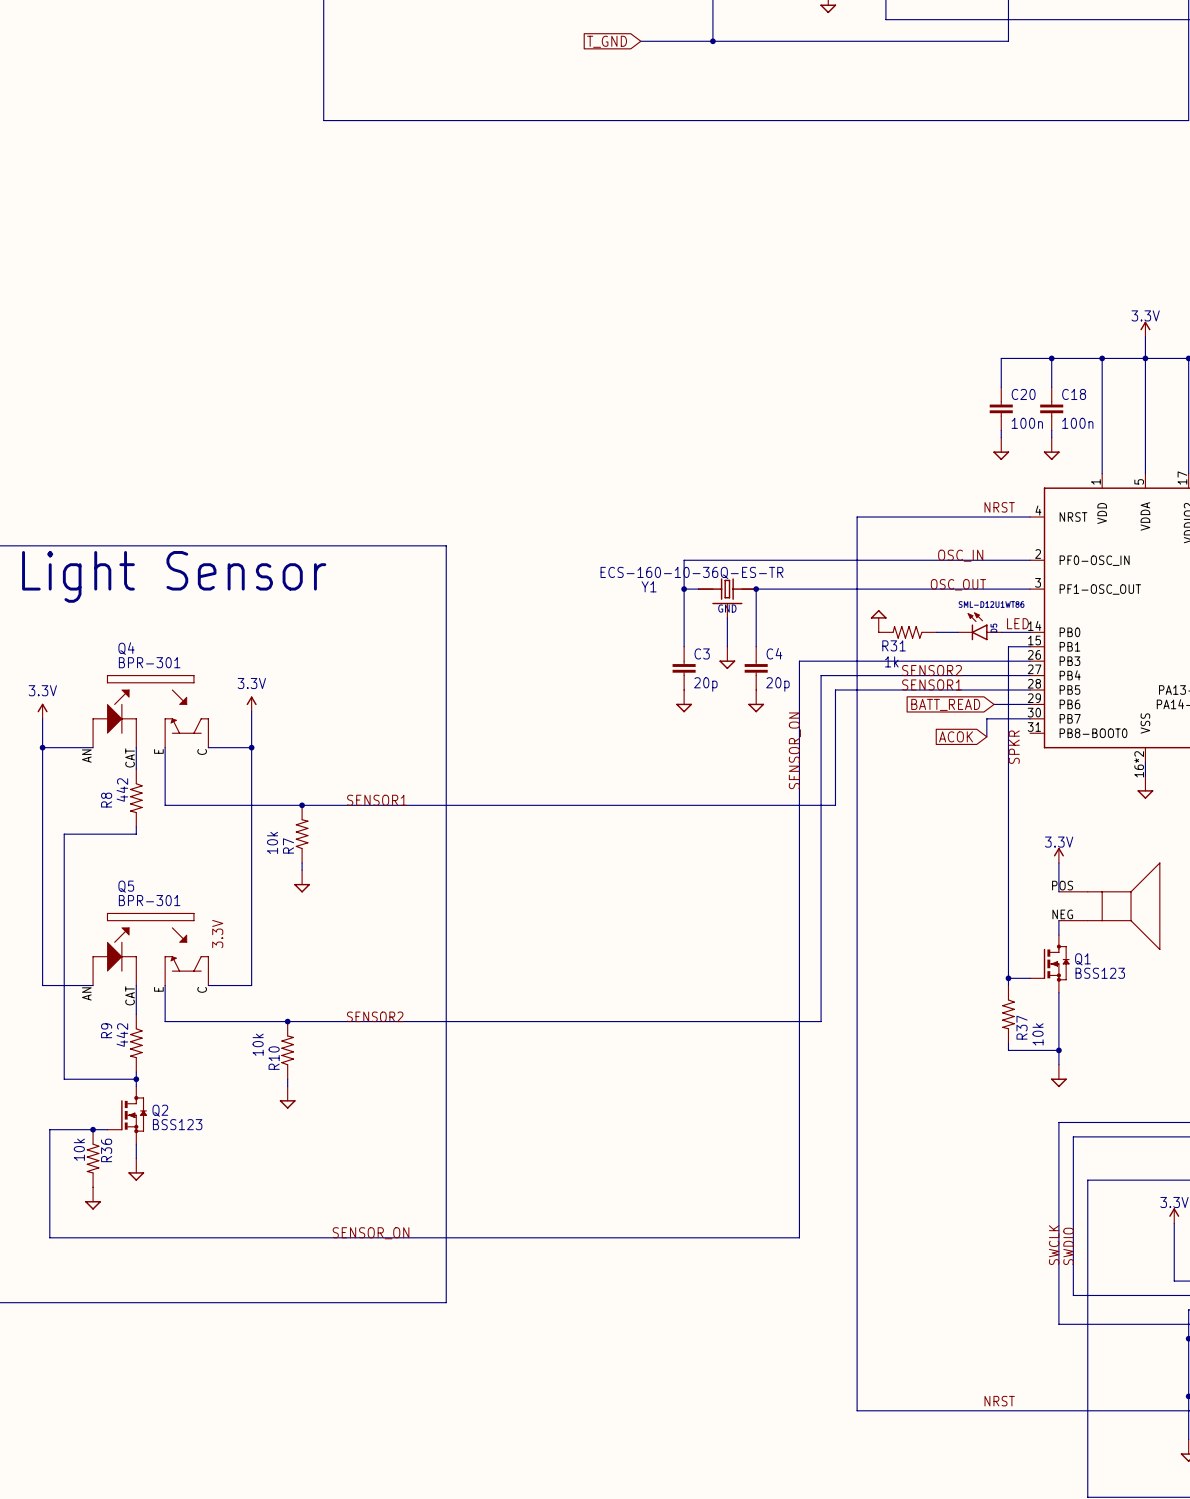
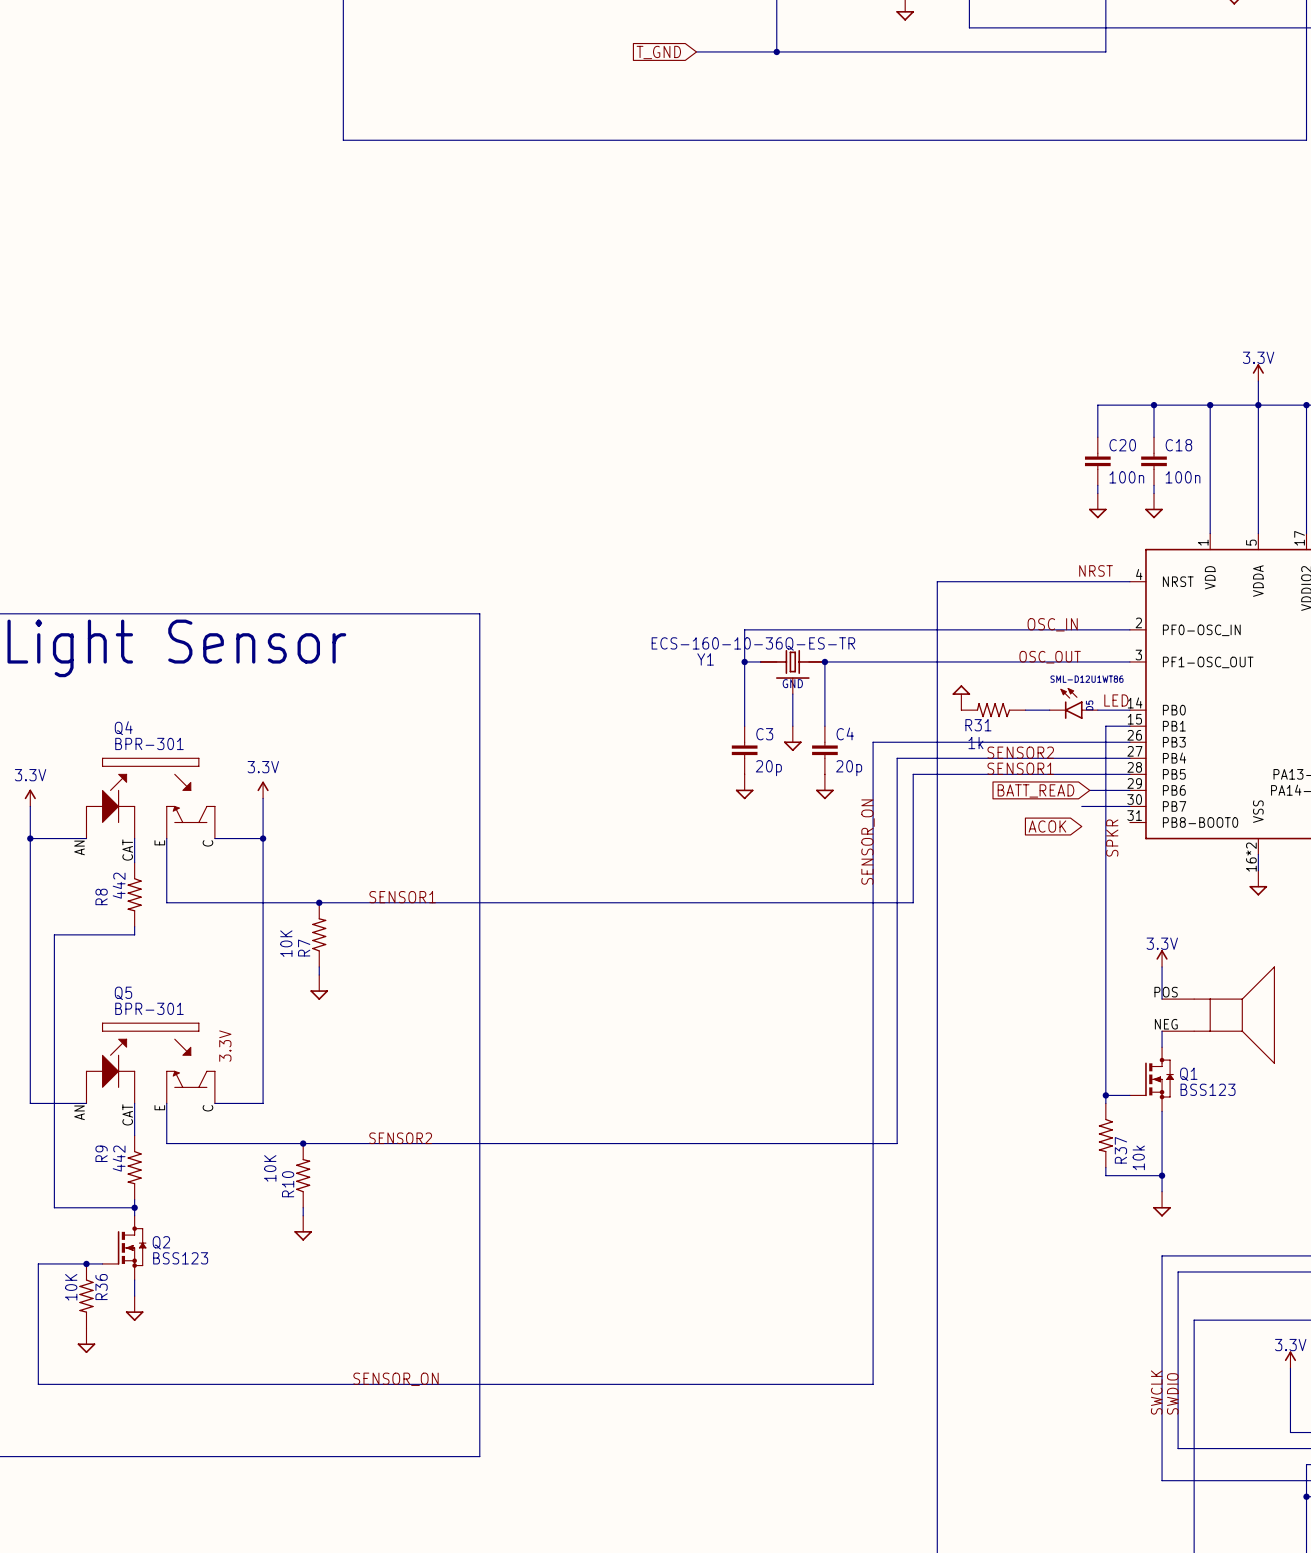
wire: (986, 718) (986, 736) -> none
R7 value: 10k (272, 842) -> 10K (286, 943)
R10 value: 10k (258, 1044) -> 10K (270, 1168)
R36 value: 10k (79, 1149) -> 10K (71, 1287)

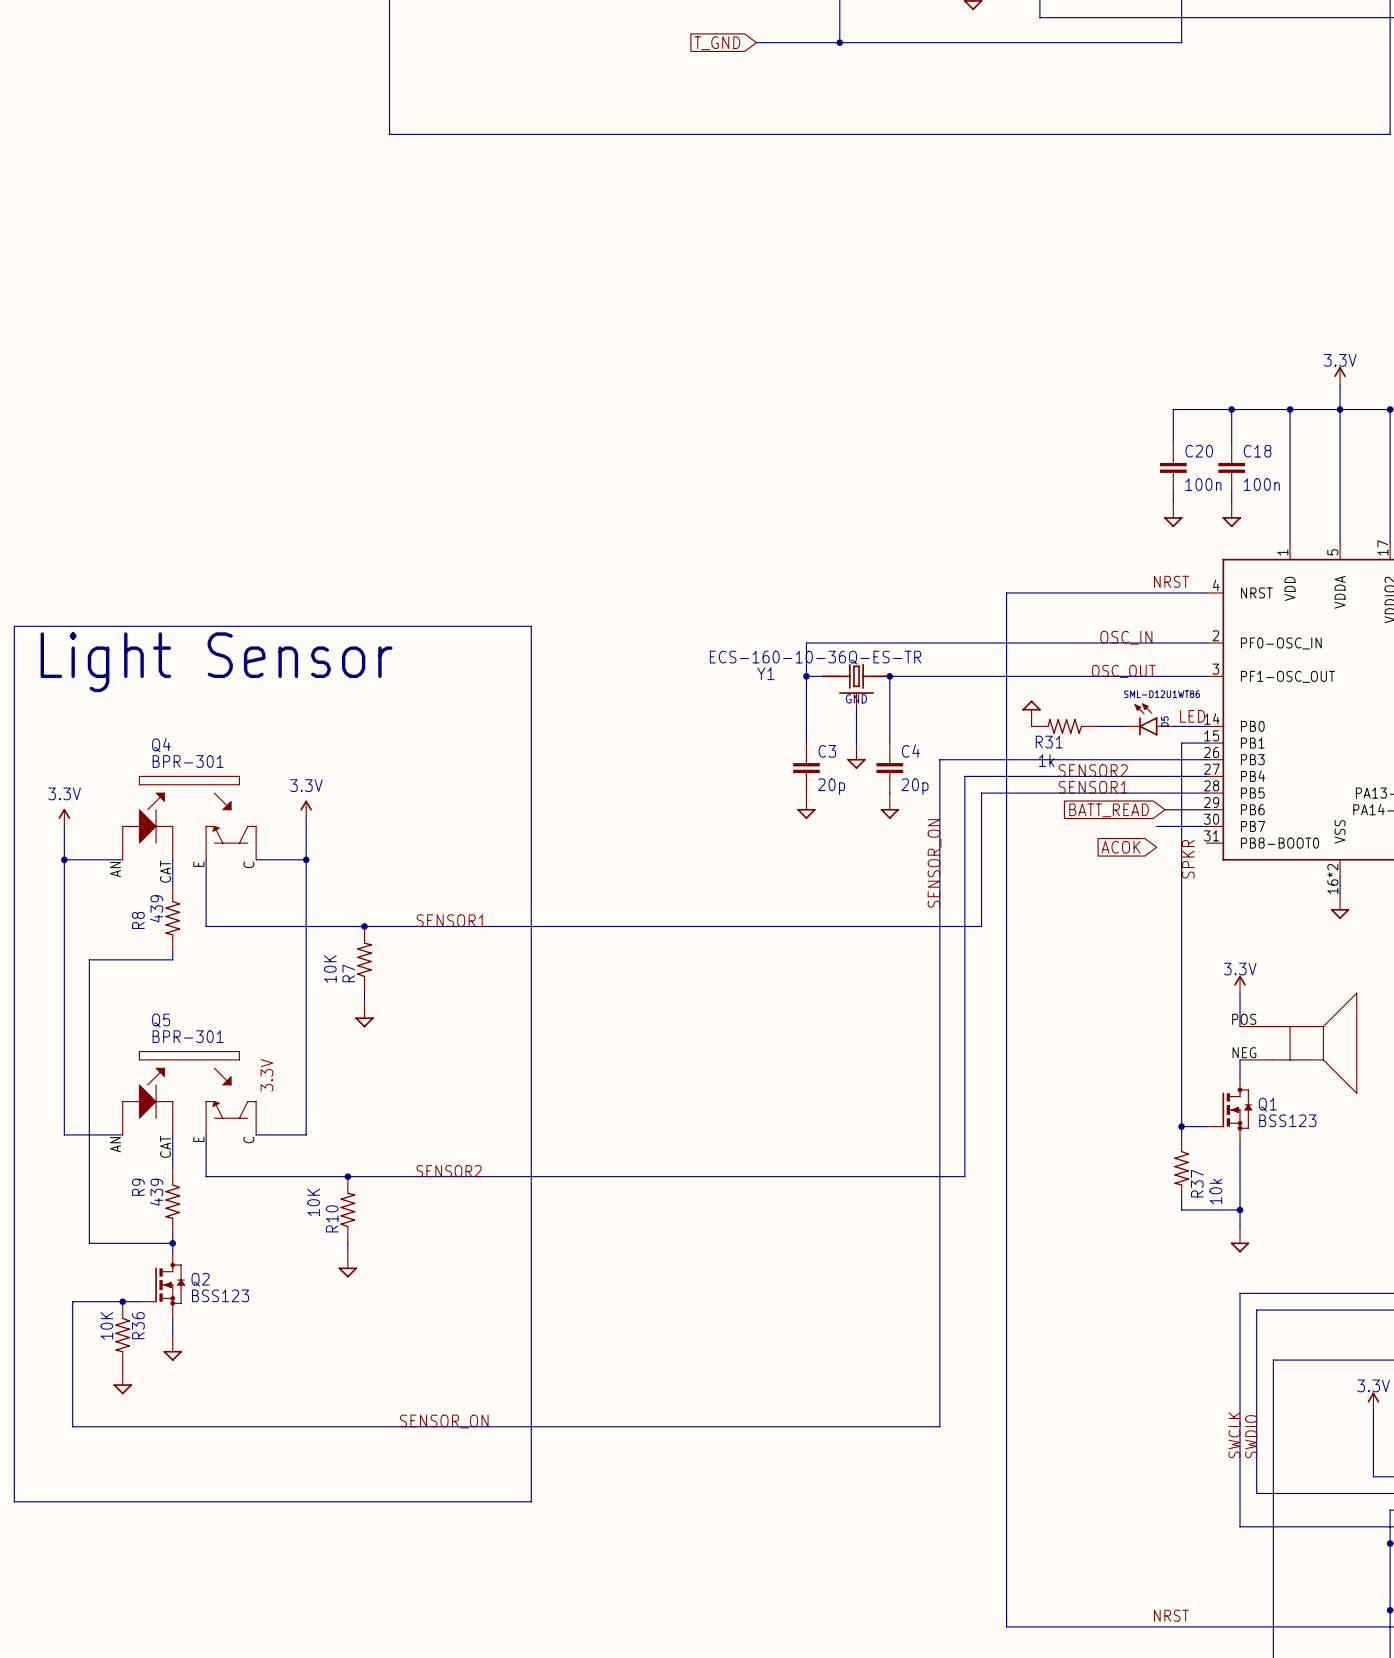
R8 value: 442 (119, 885) -> 439 (156, 908)
R9 value: 442 (119, 1158) -> 439 (156, 1192)

